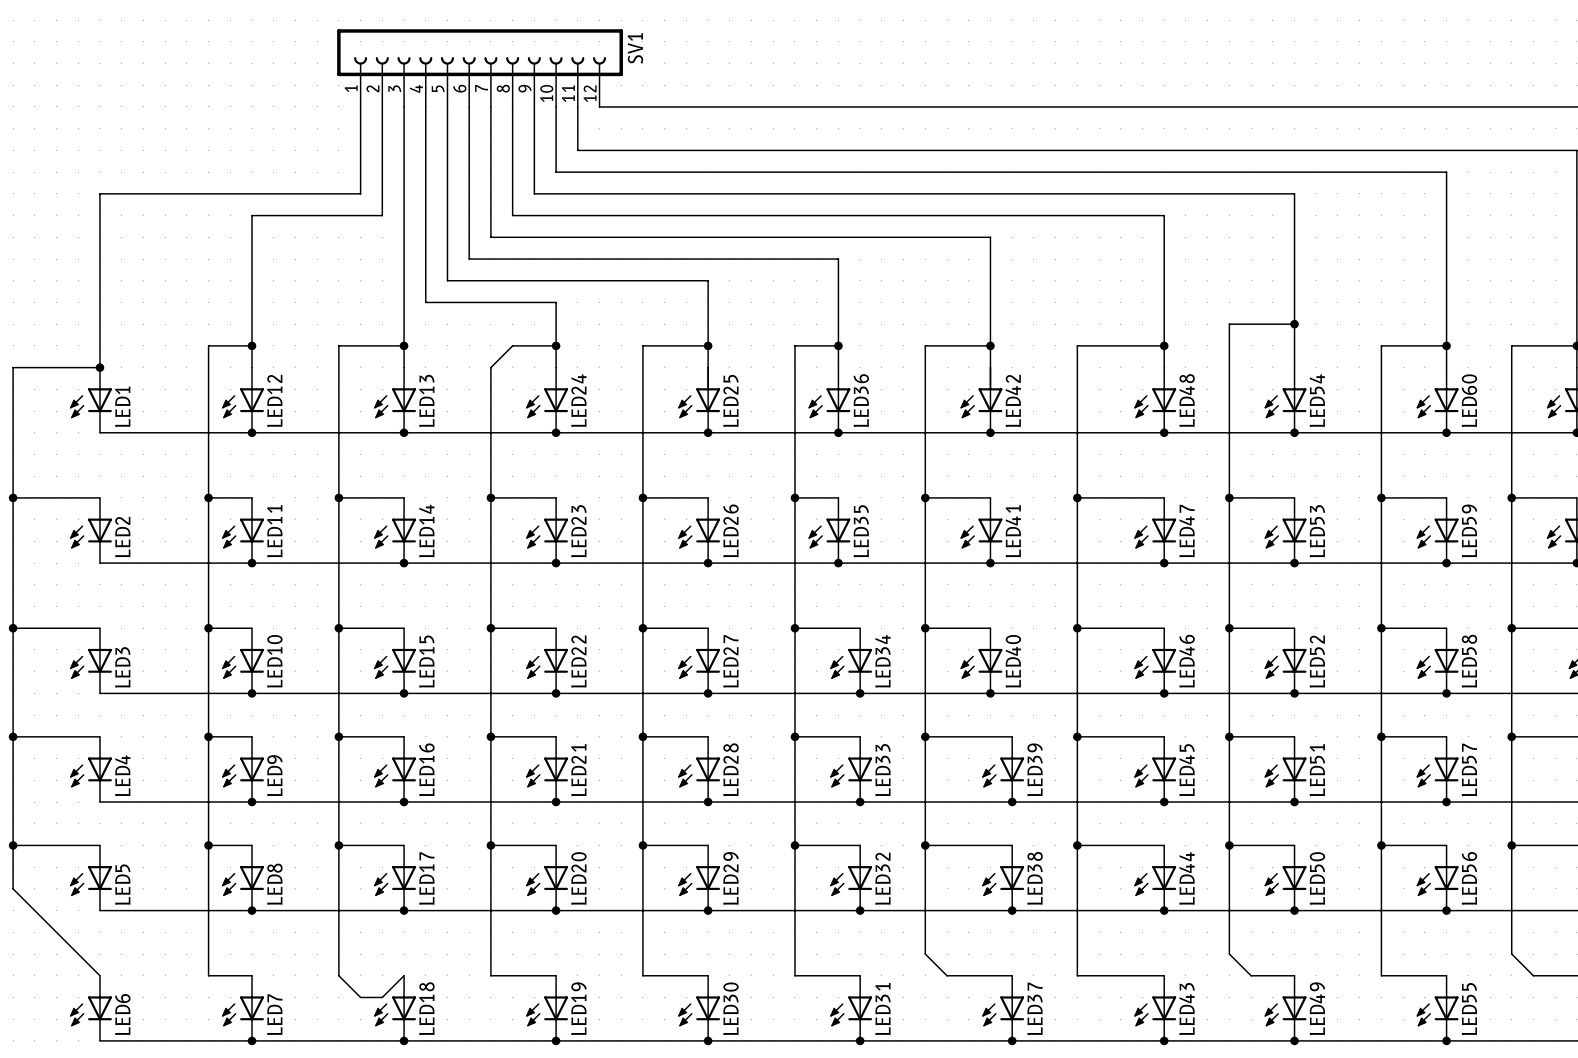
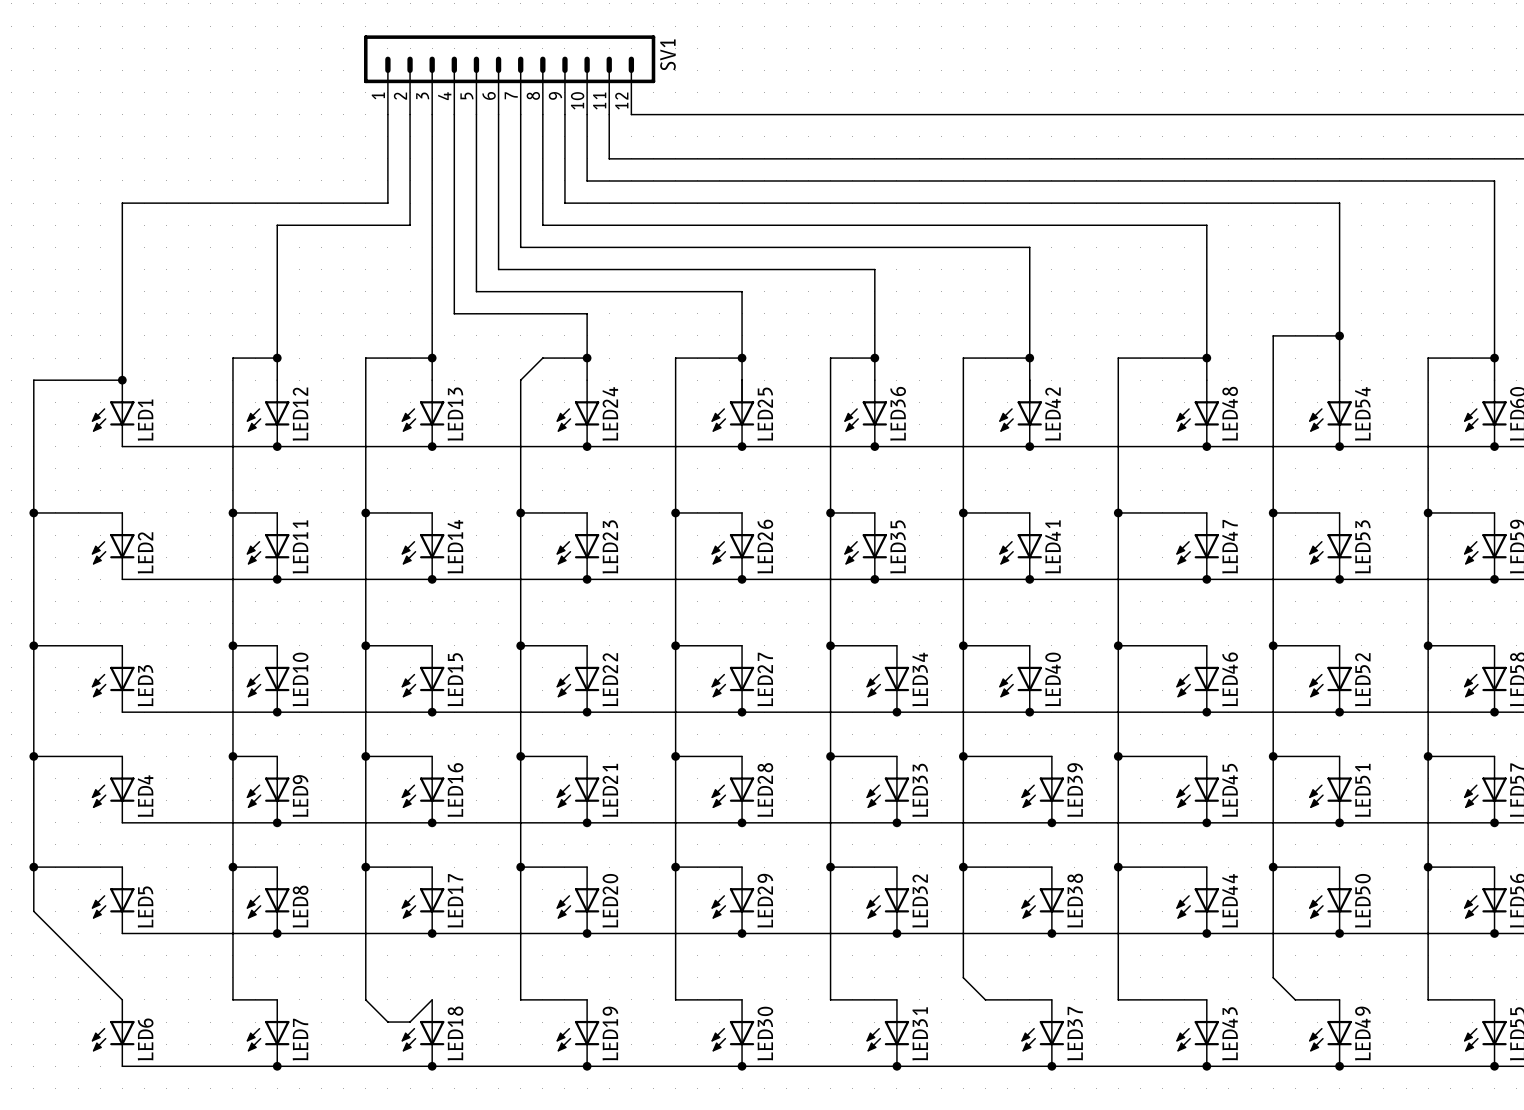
SV1 symbol: [337, 29, 623, 107] -> [364, 35, 656, 115]

